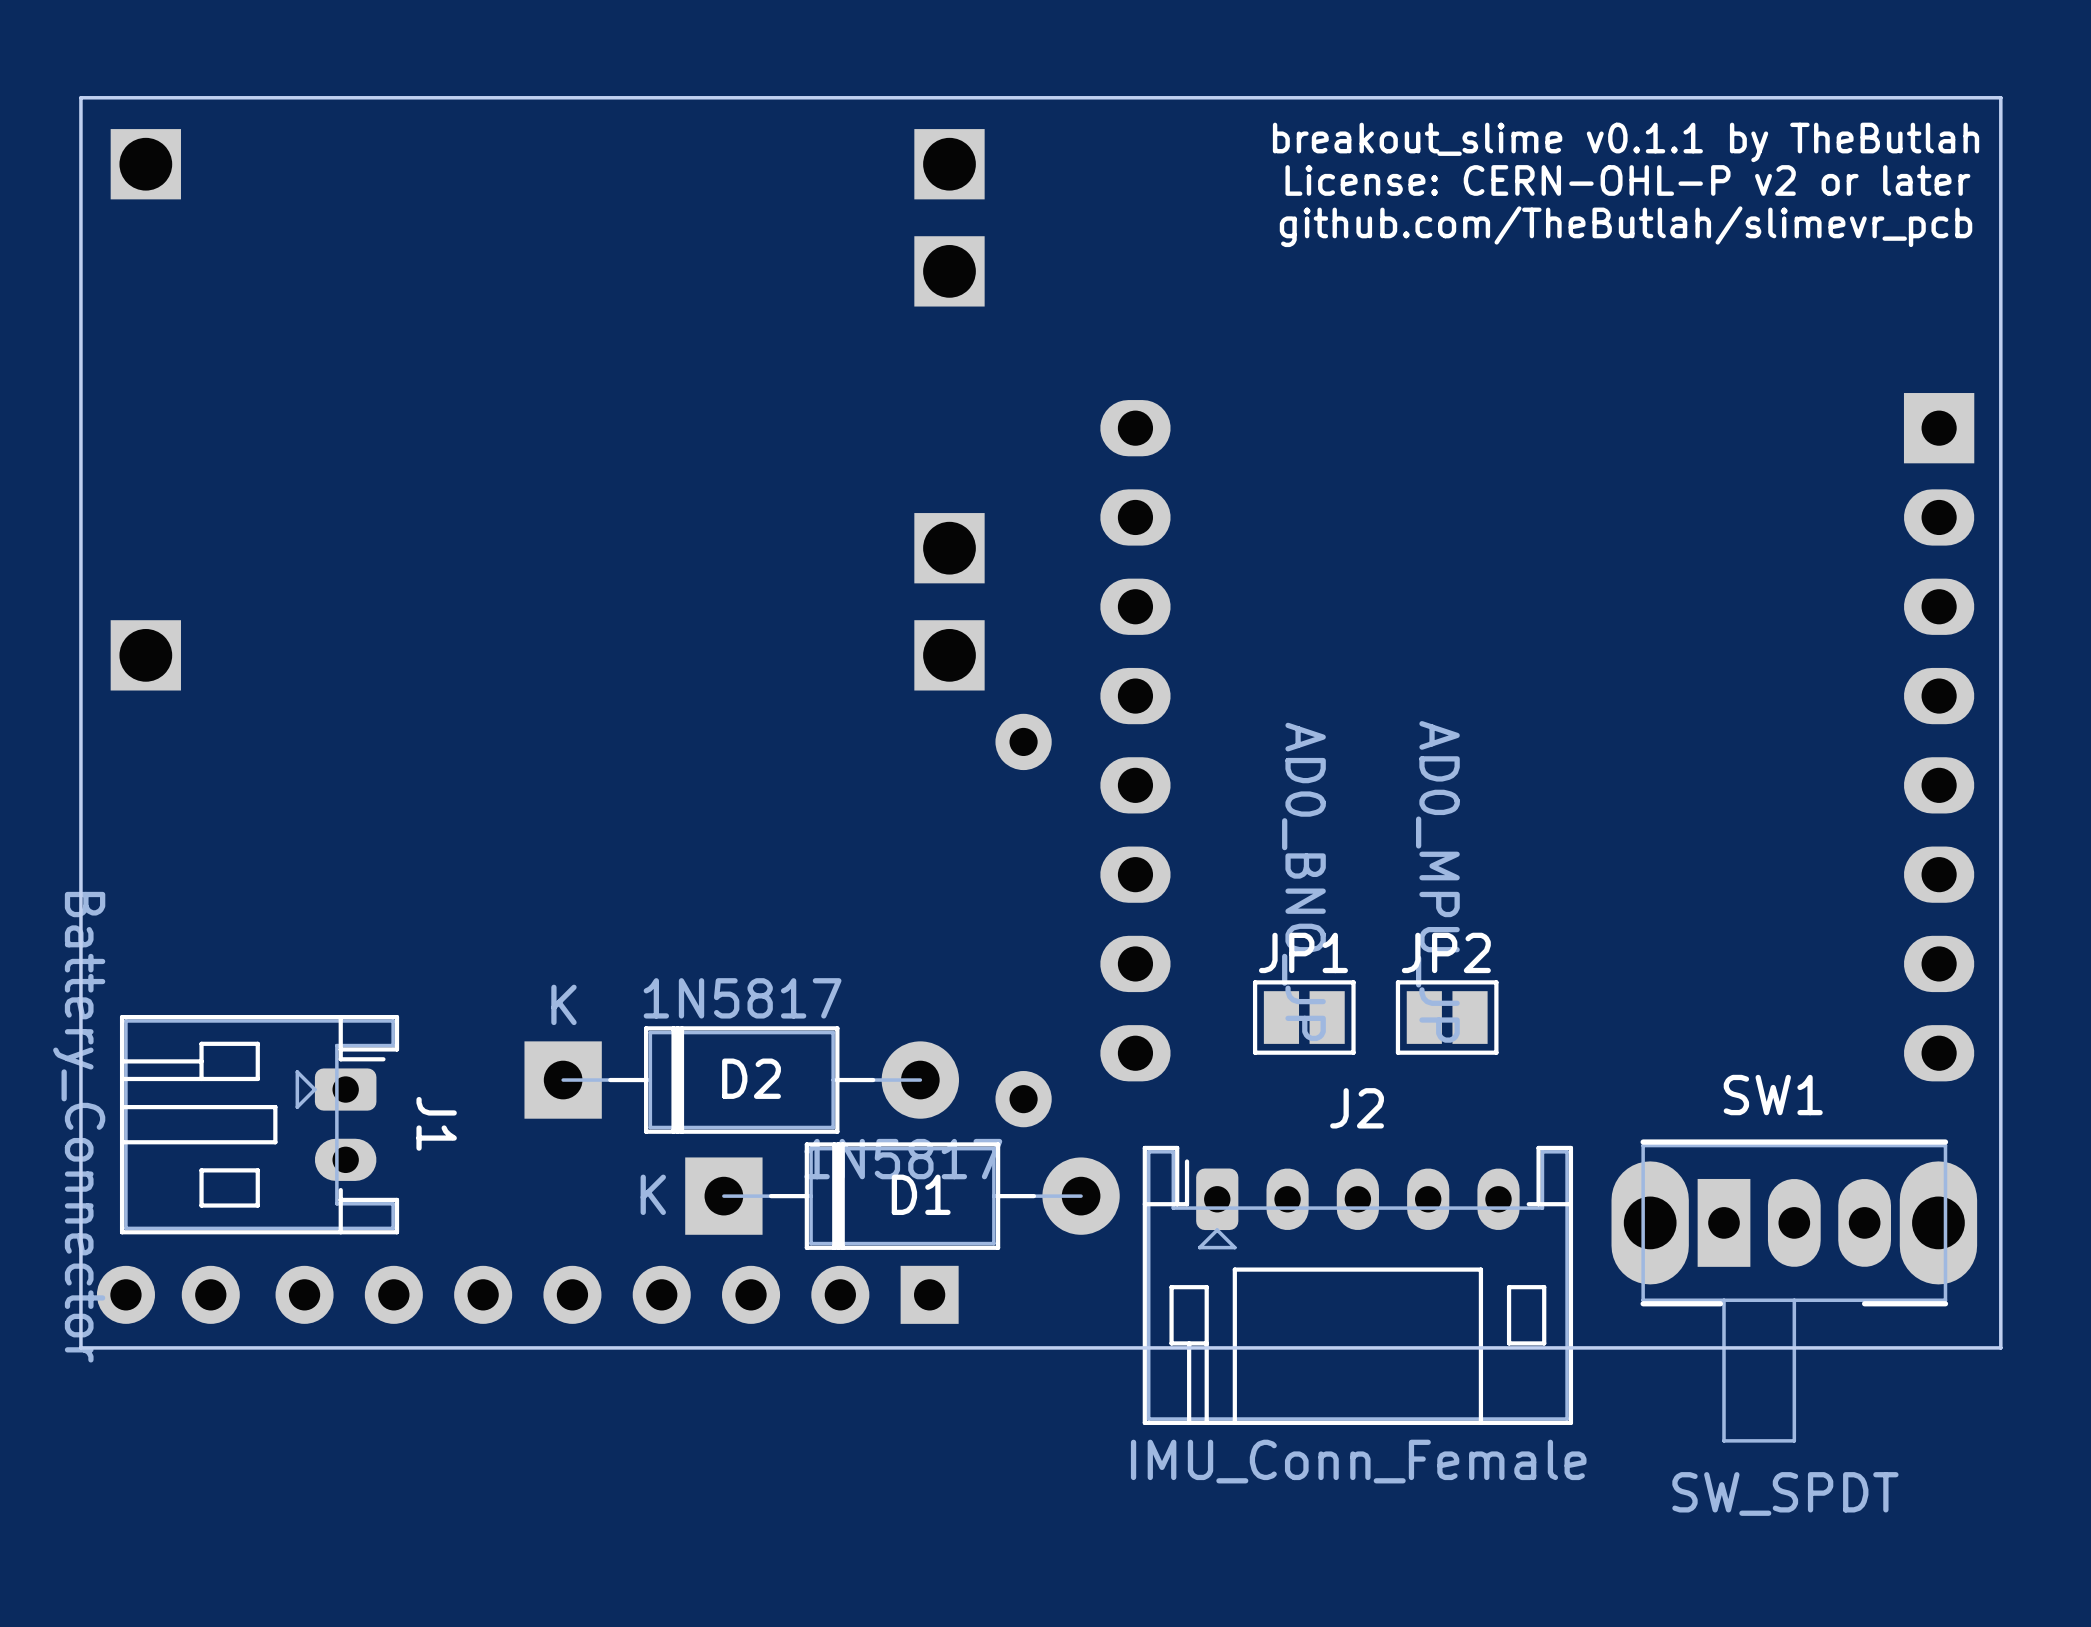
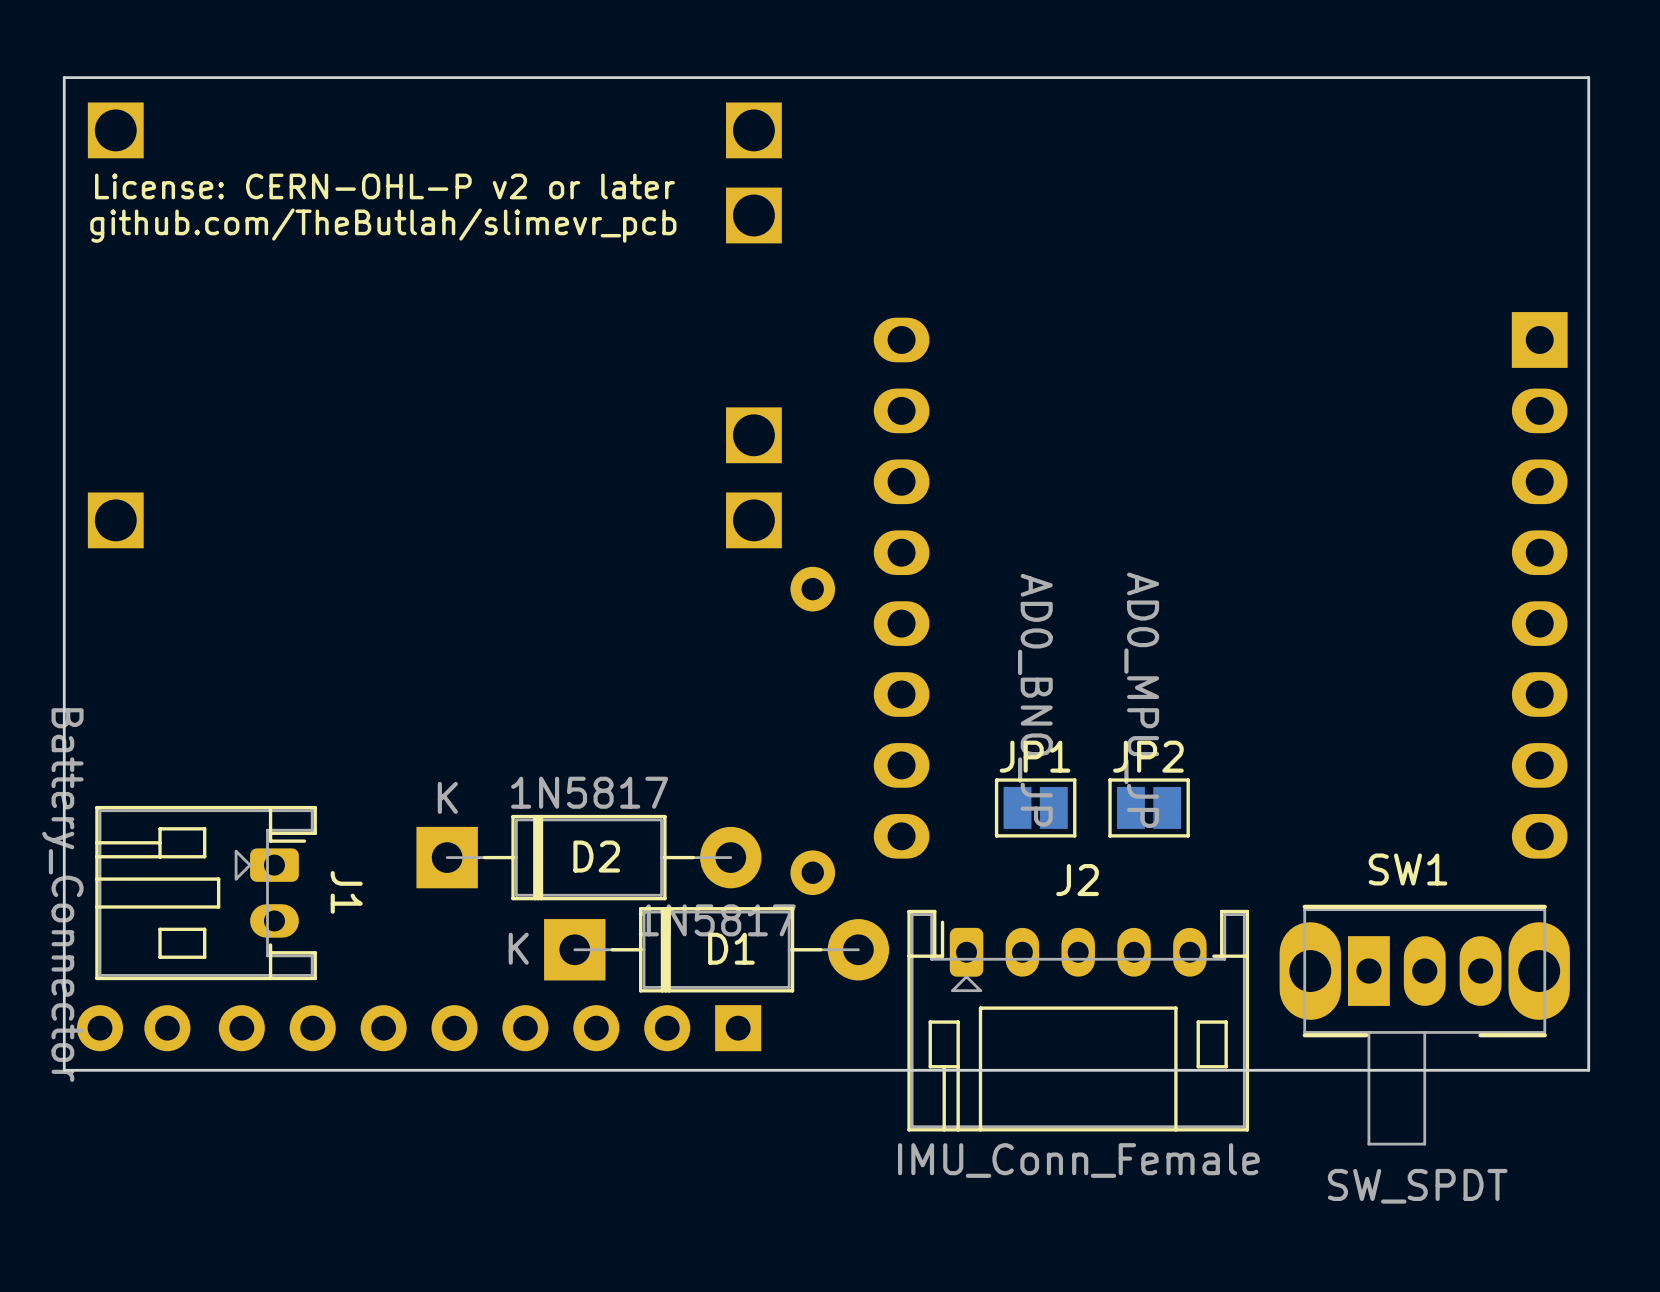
text: breakout_slime v0.1.1 by TheButlah (1626, 142) -> none
text: License: CERN-OHL-P v2 or later (1627, 180) -> none
text: github.com/TheButlah/slimevr_pcb (1626, 226) -> none
text: none -> License: CERN-OHL-P v2 or later (384, 186)
text: none -> github.com/TheButlah/slimevr_pcb (383, 225)

